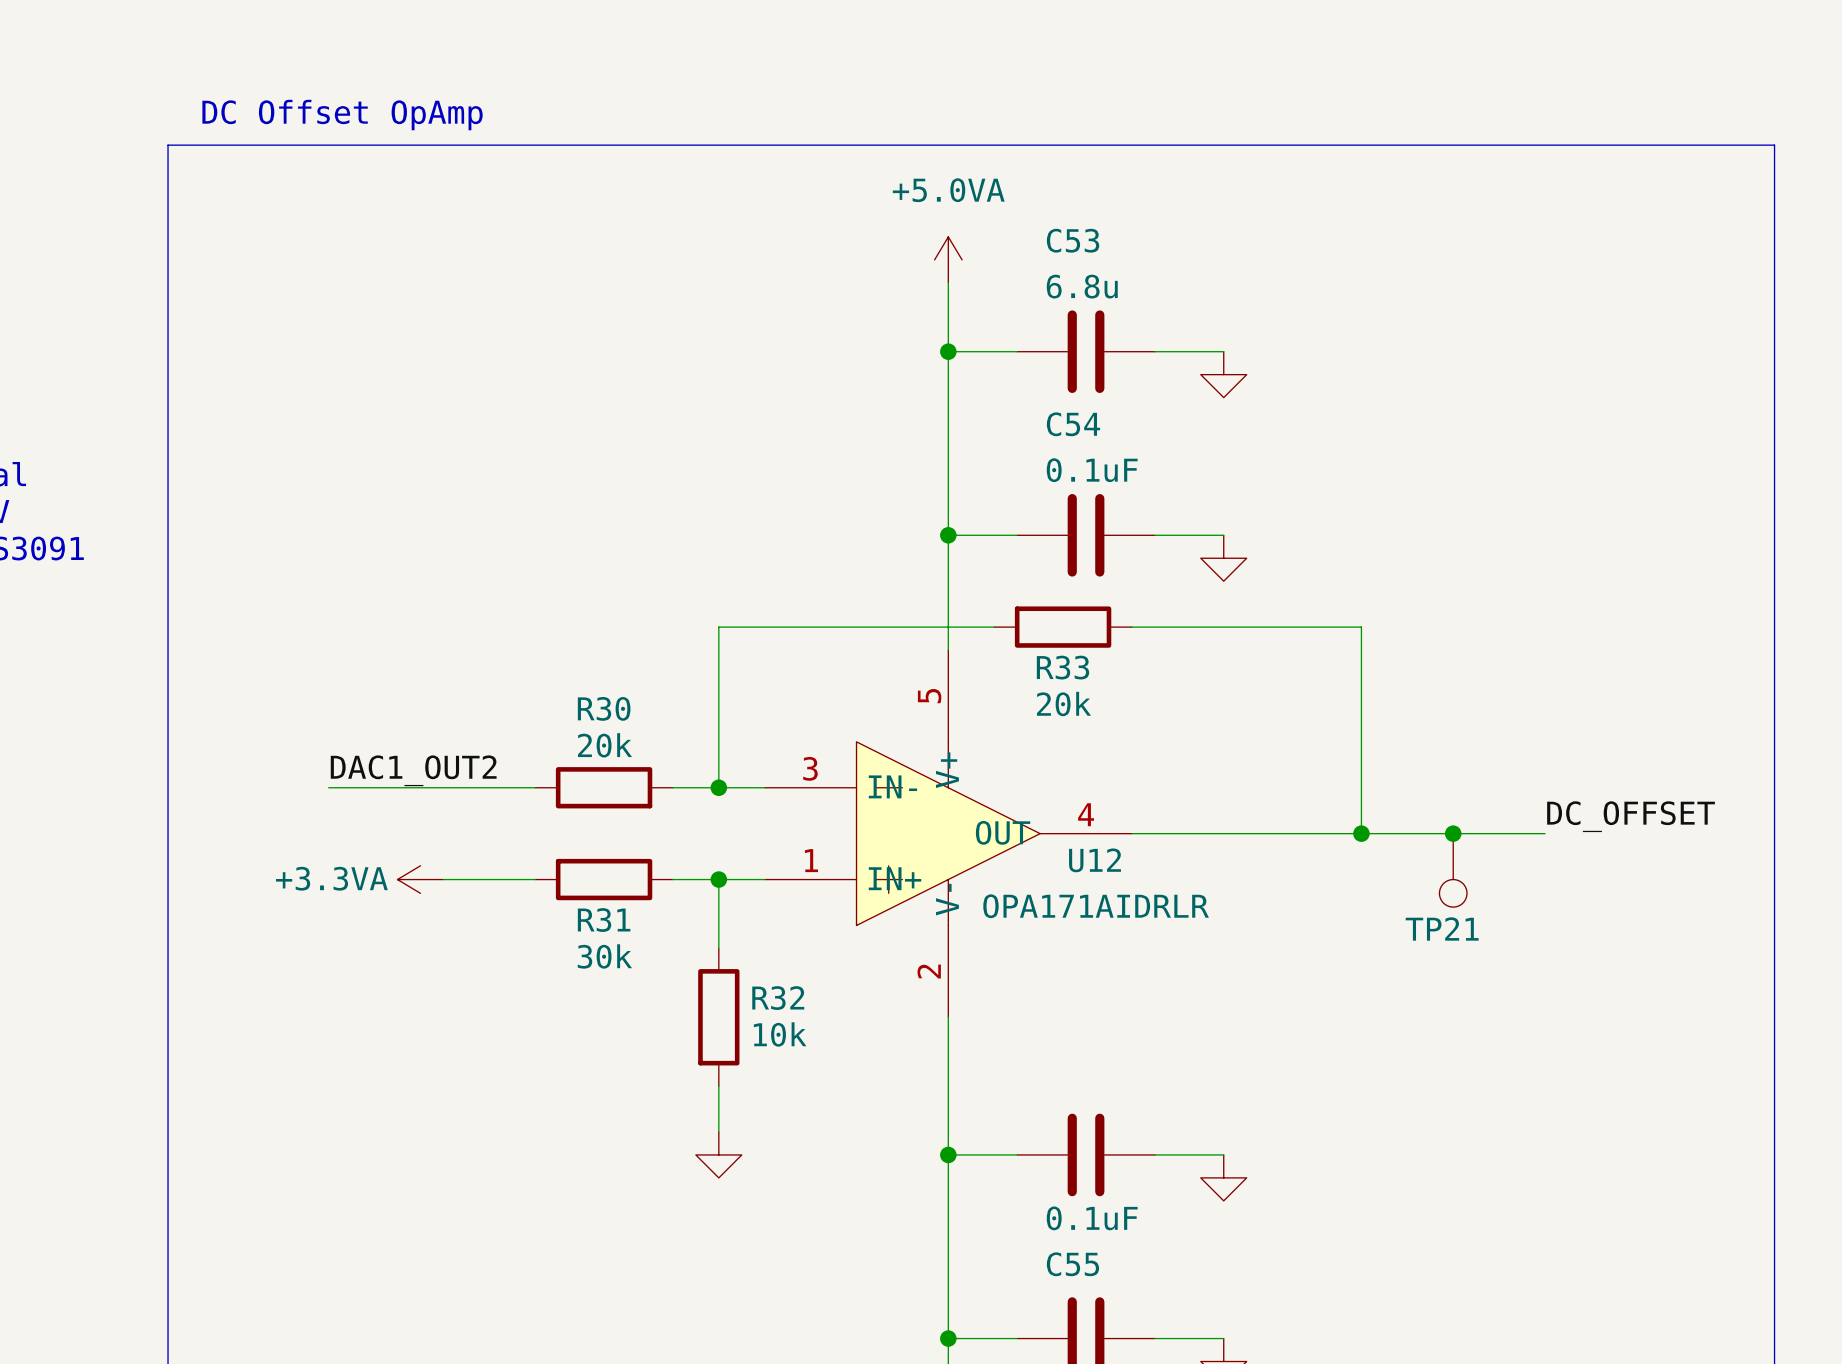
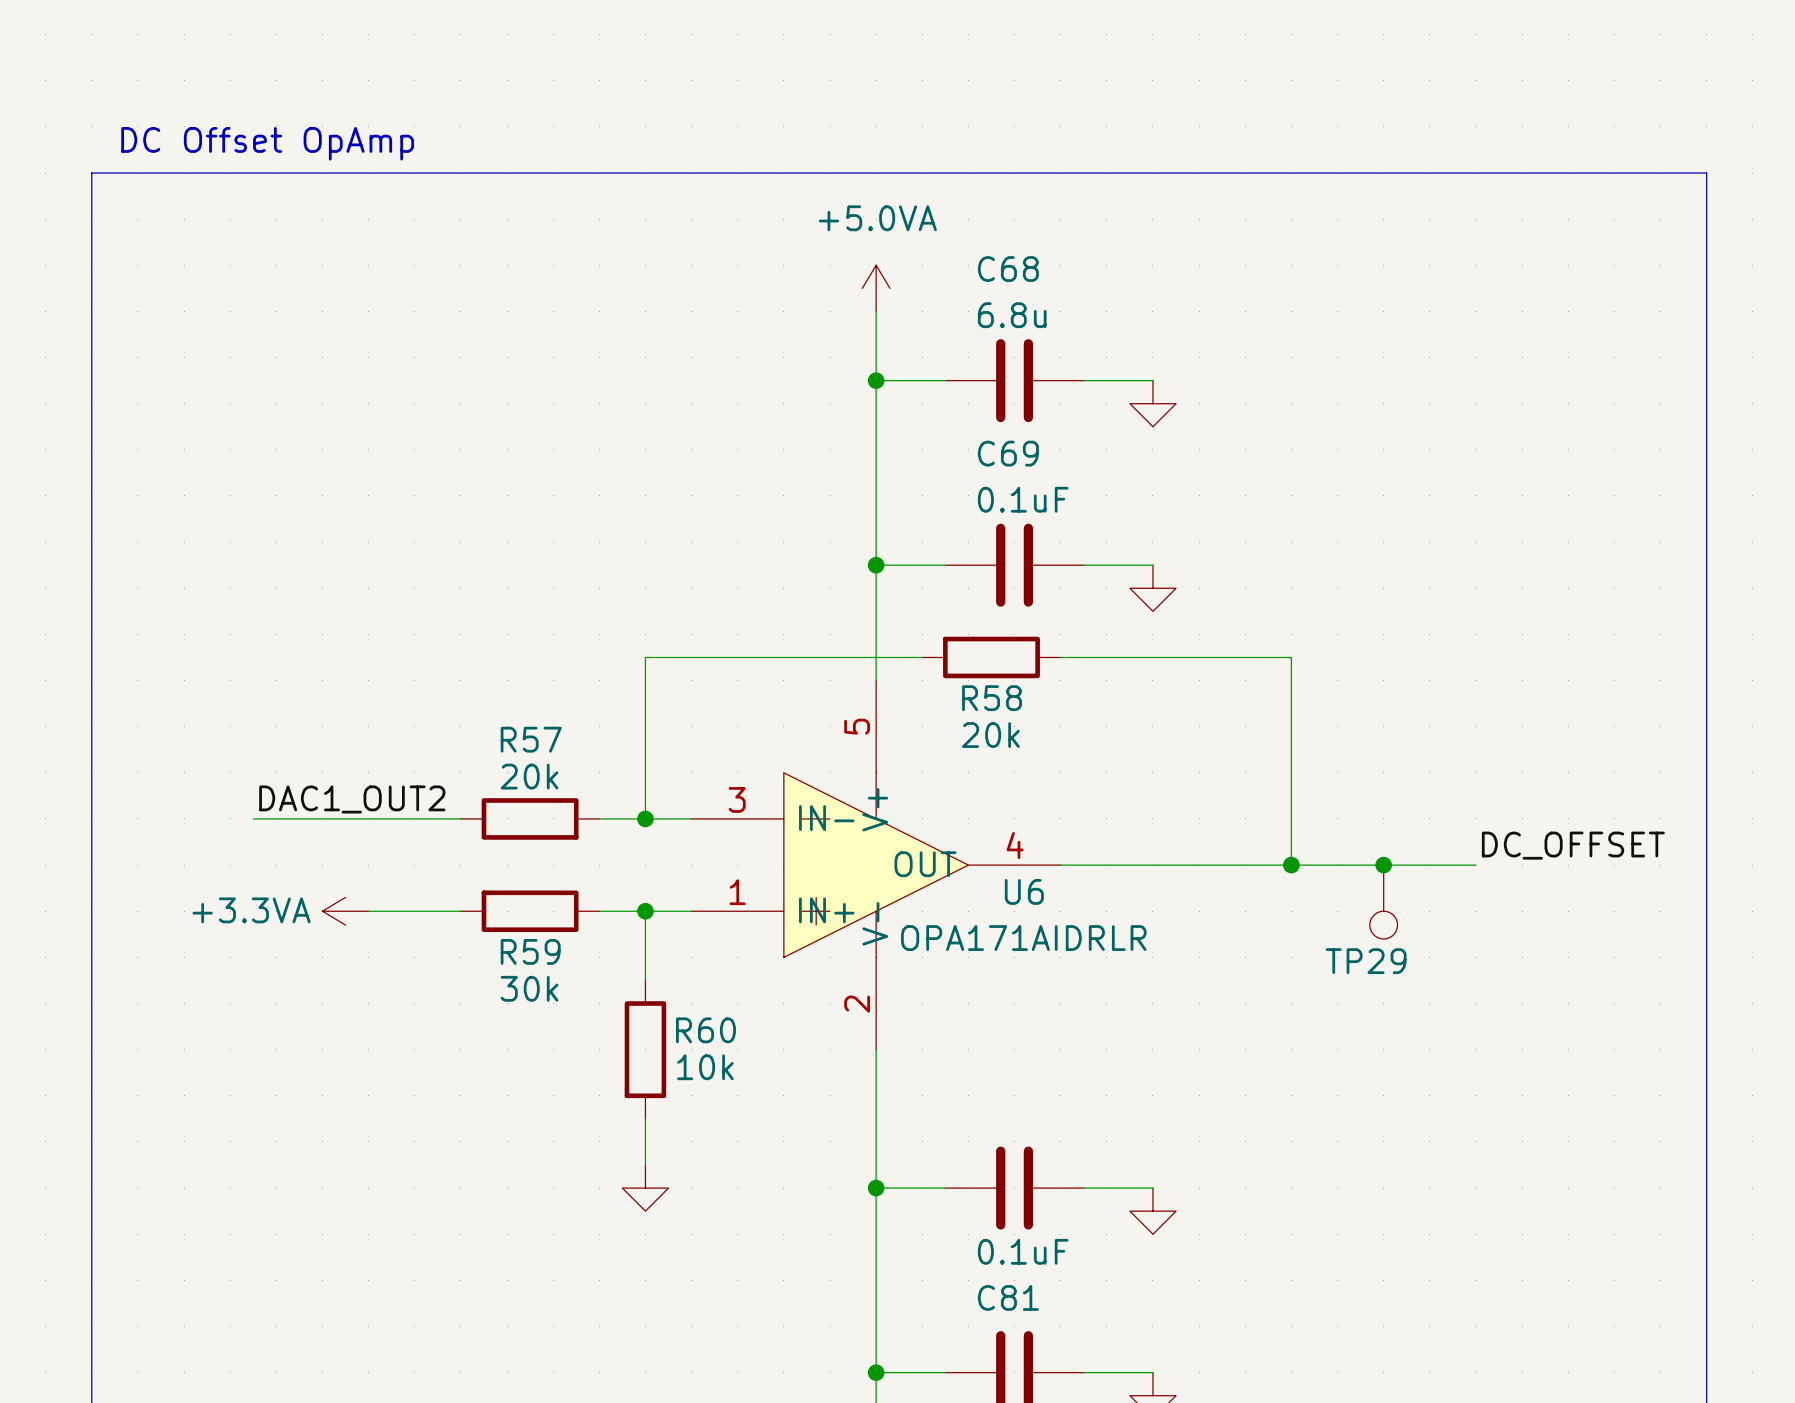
C53 name: C53 (1073, 240) -> C68 (1008, 269)
C54 name: C54 (1073, 424) -> C69 (1008, 453)
R33 name: R33 (1062, 667) -> R58 (992, 698)
R30 name: R30 (604, 708) -> R57 (531, 739)
U12 name: U12 (1095, 860) -> U6 (1024, 891)
R31 name: R31 (604, 920) -> R59 (530, 951)
TP21 name: TP21 (1442, 928) -> TP29 (1366, 961)
R32 name: R32 (778, 998) -> R60 (705, 1030)
C55 name: C55 (1072, 1264) -> C81 (1008, 1297)

